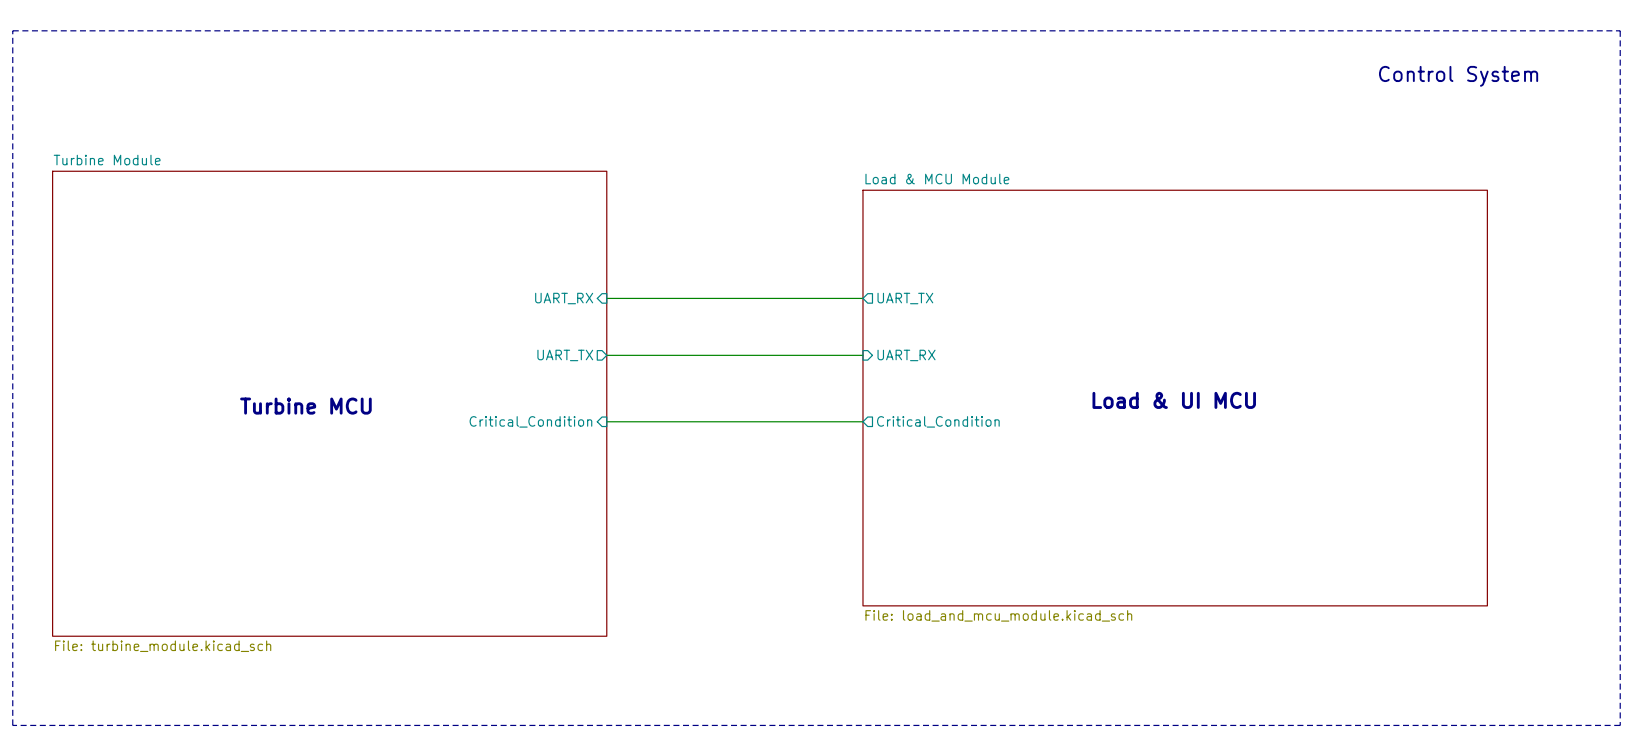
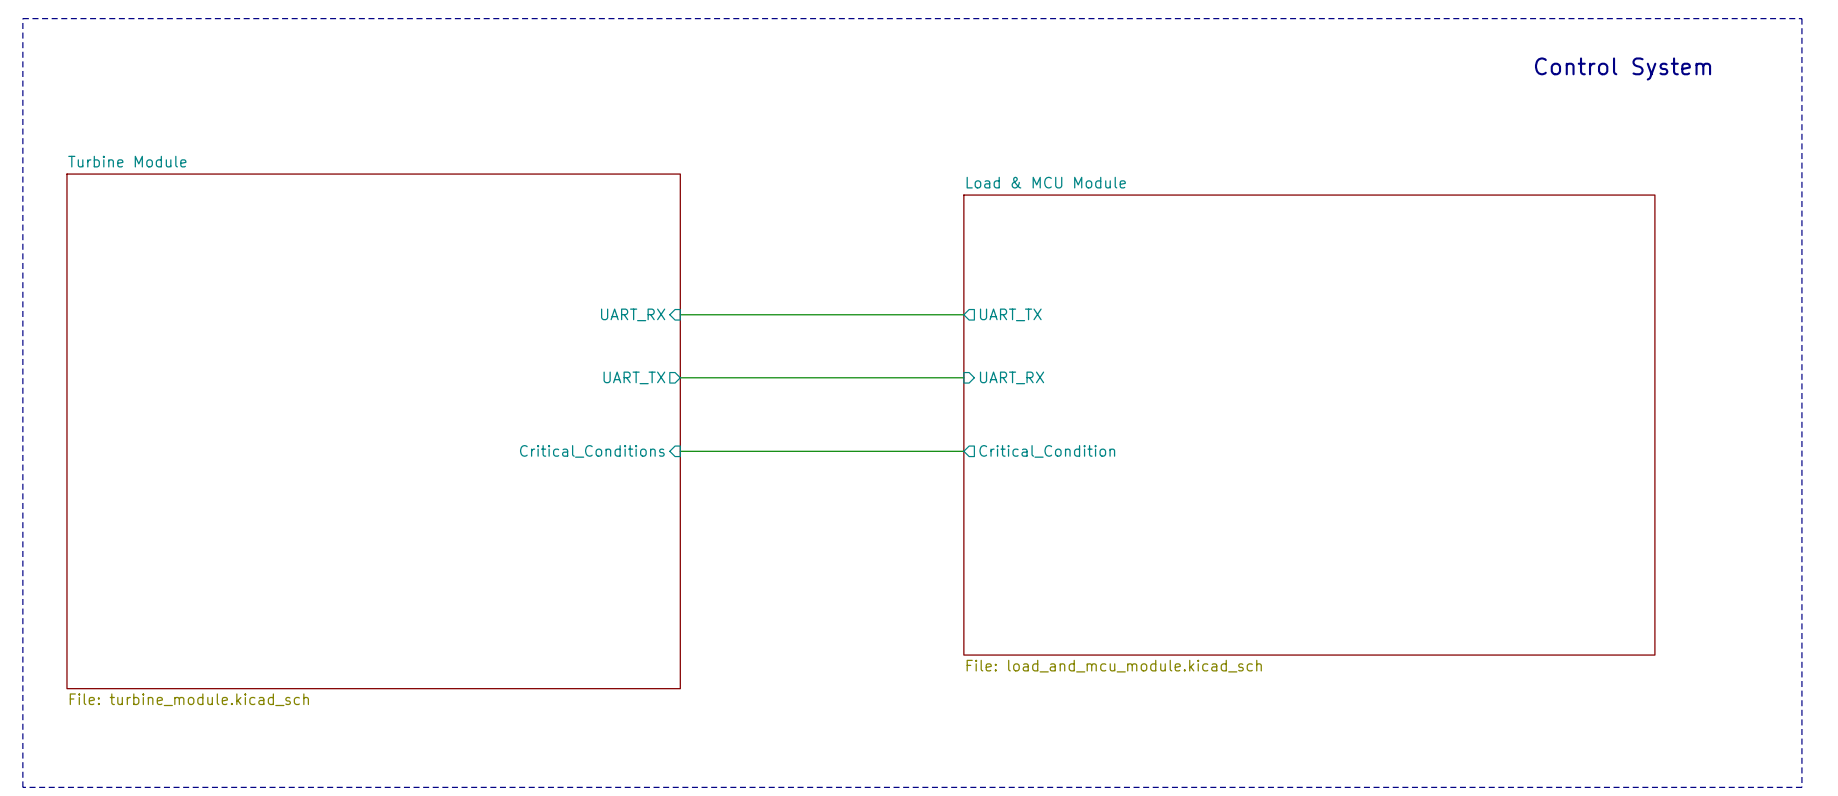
text: Load & UI MCU (1174, 400) -> none
text: Turbine MCU (305, 406) -> none
sheet pin: Critical_Condition (530, 421) -> Critical_Conditions (592, 451)

